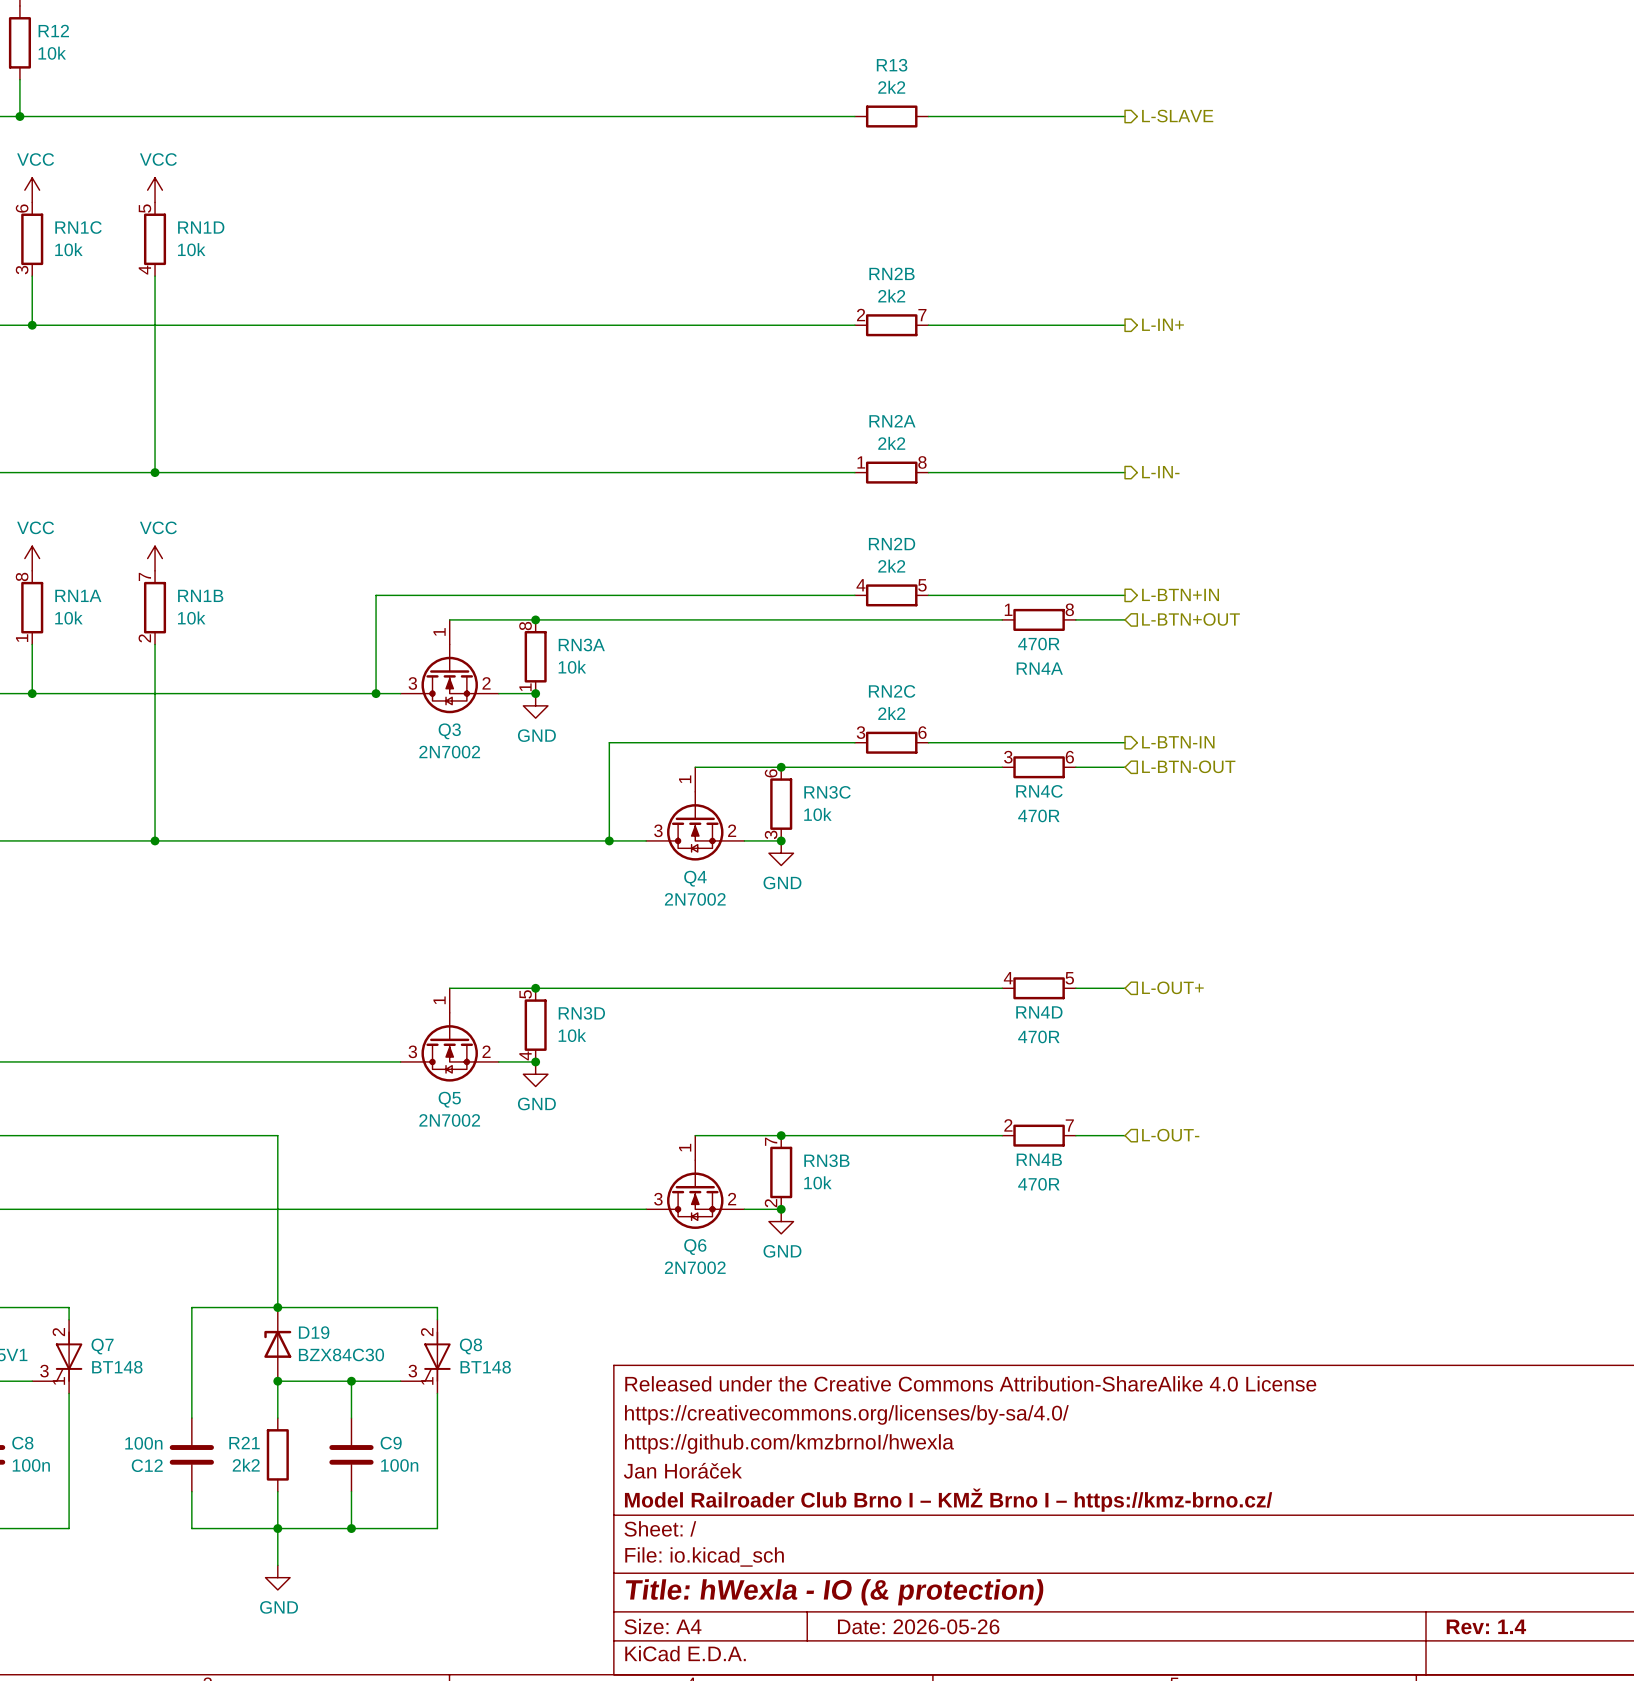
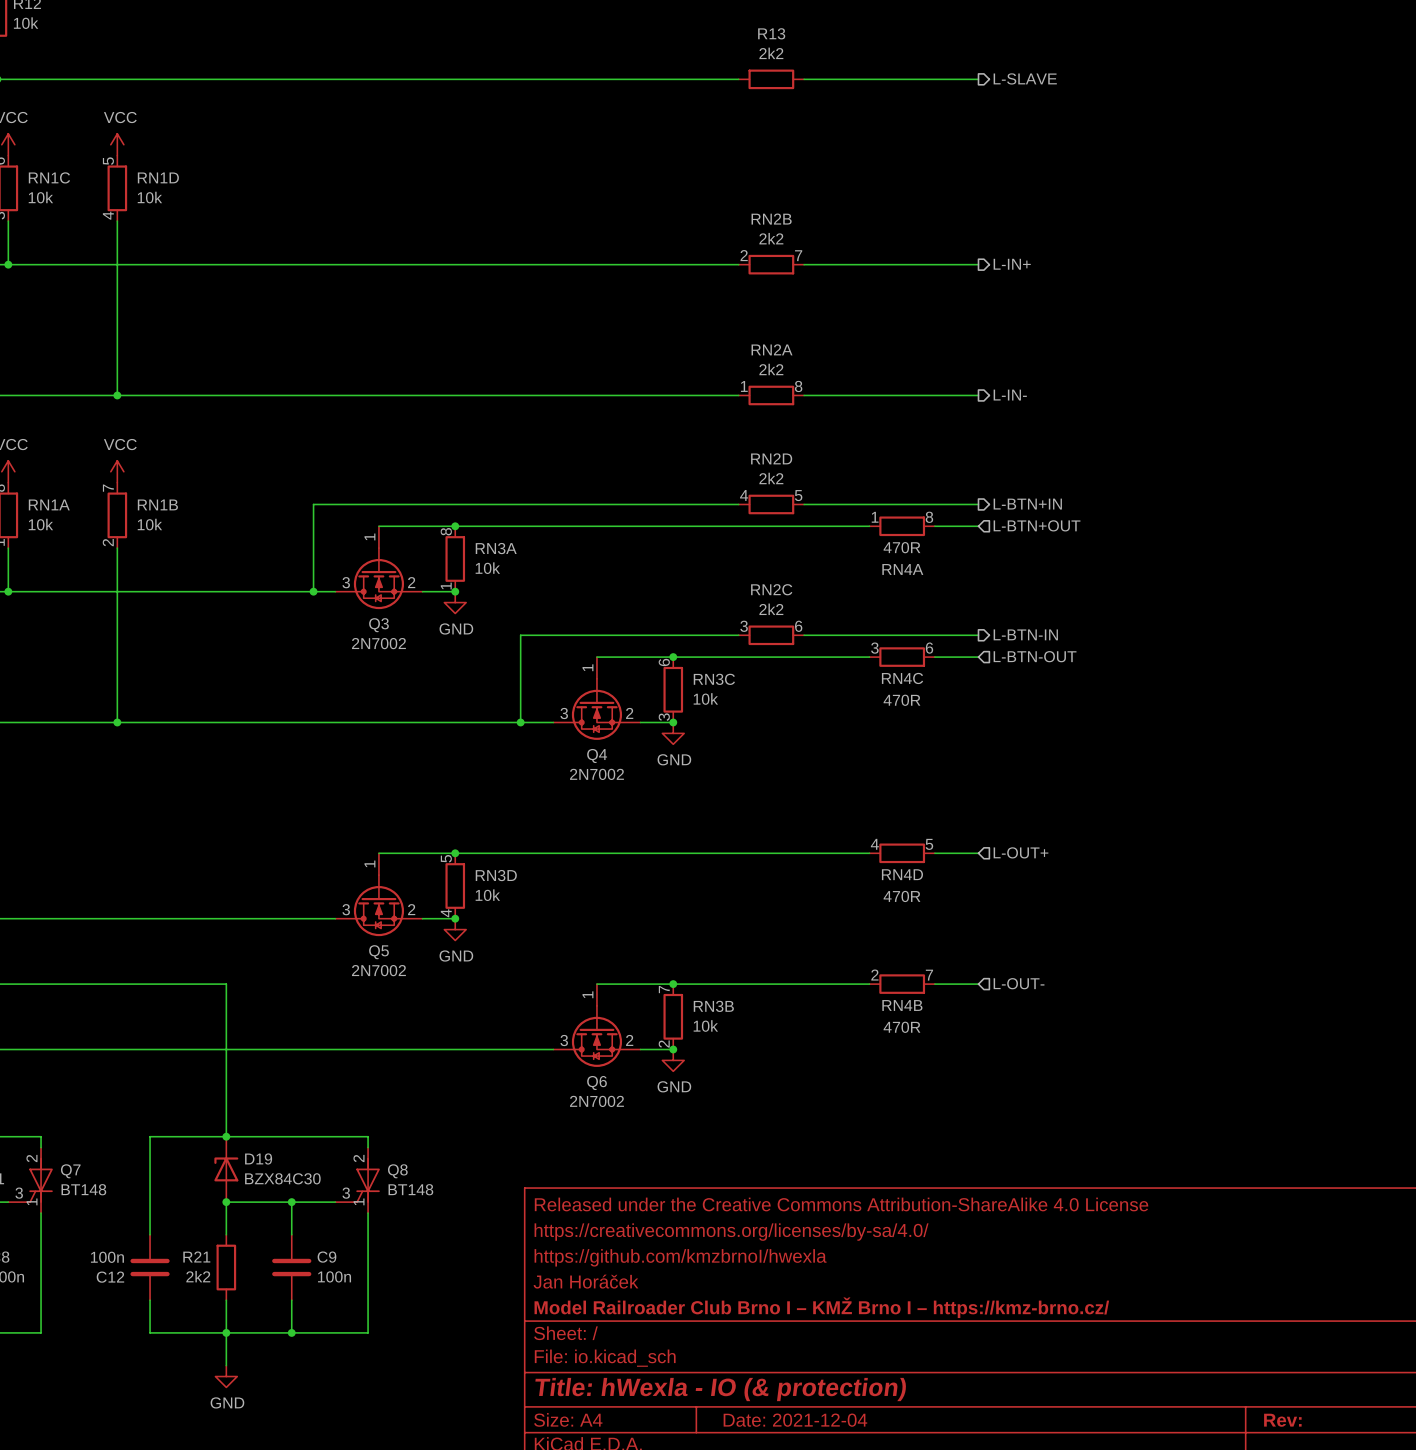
title block: Date: 2026-05-26 (918, 1626) -> Date: 2021-12-04 (795, 1420)
title block: Rev: 1.4 (1486, 1626) -> Rev: (1282, 1420)

